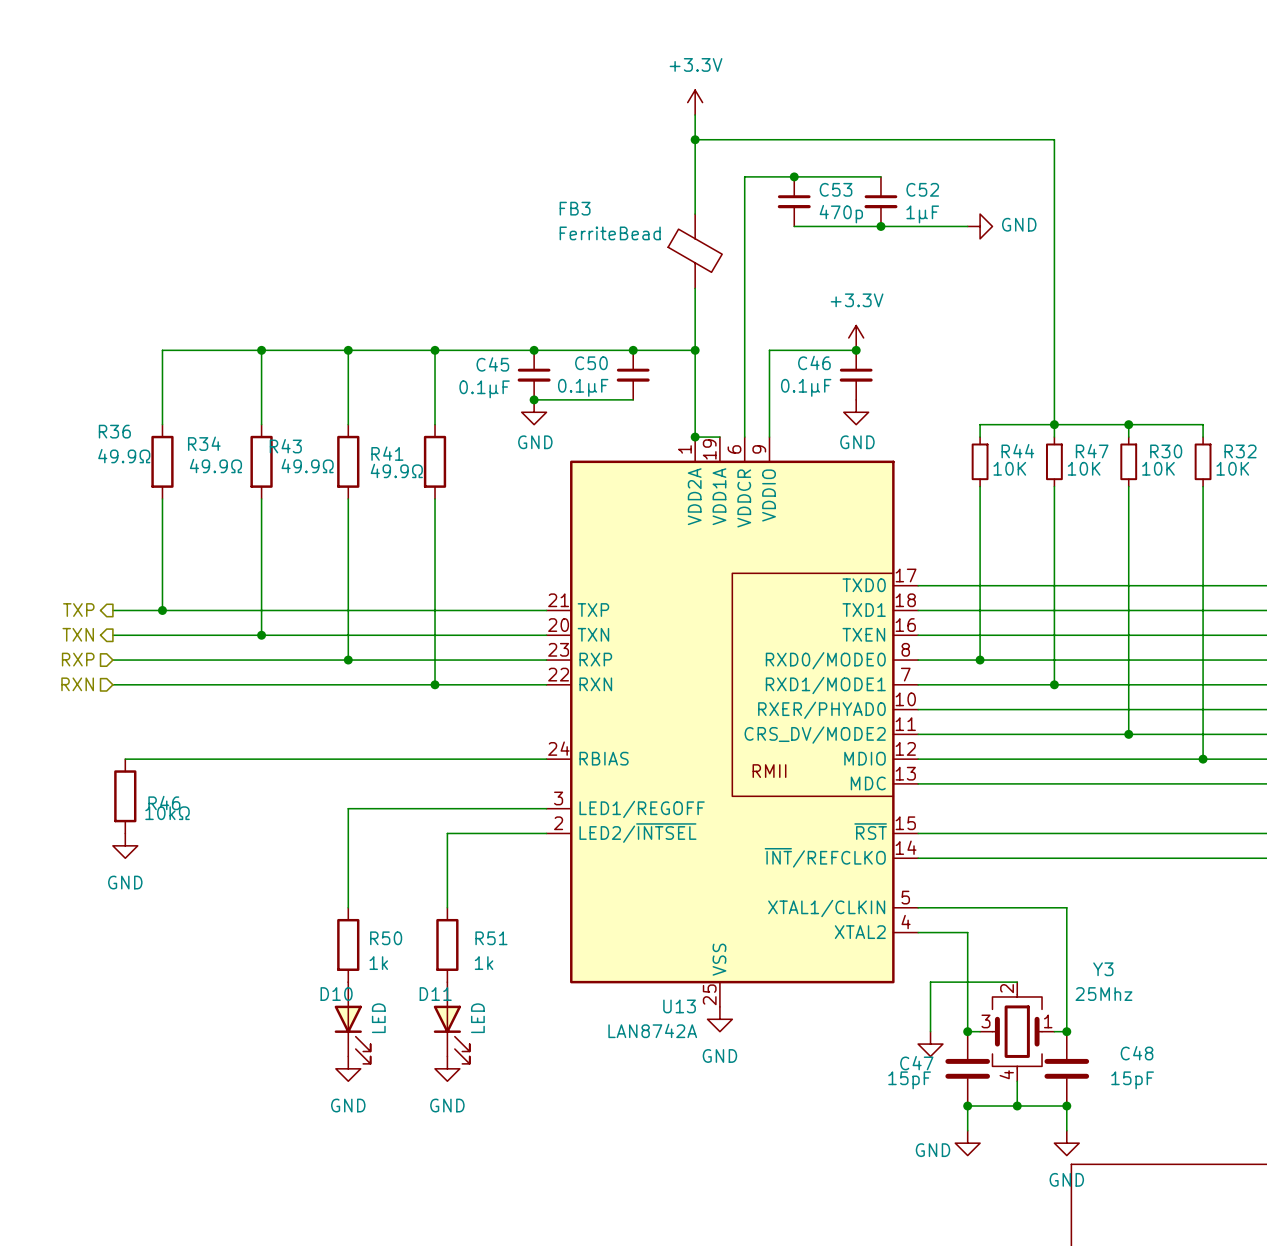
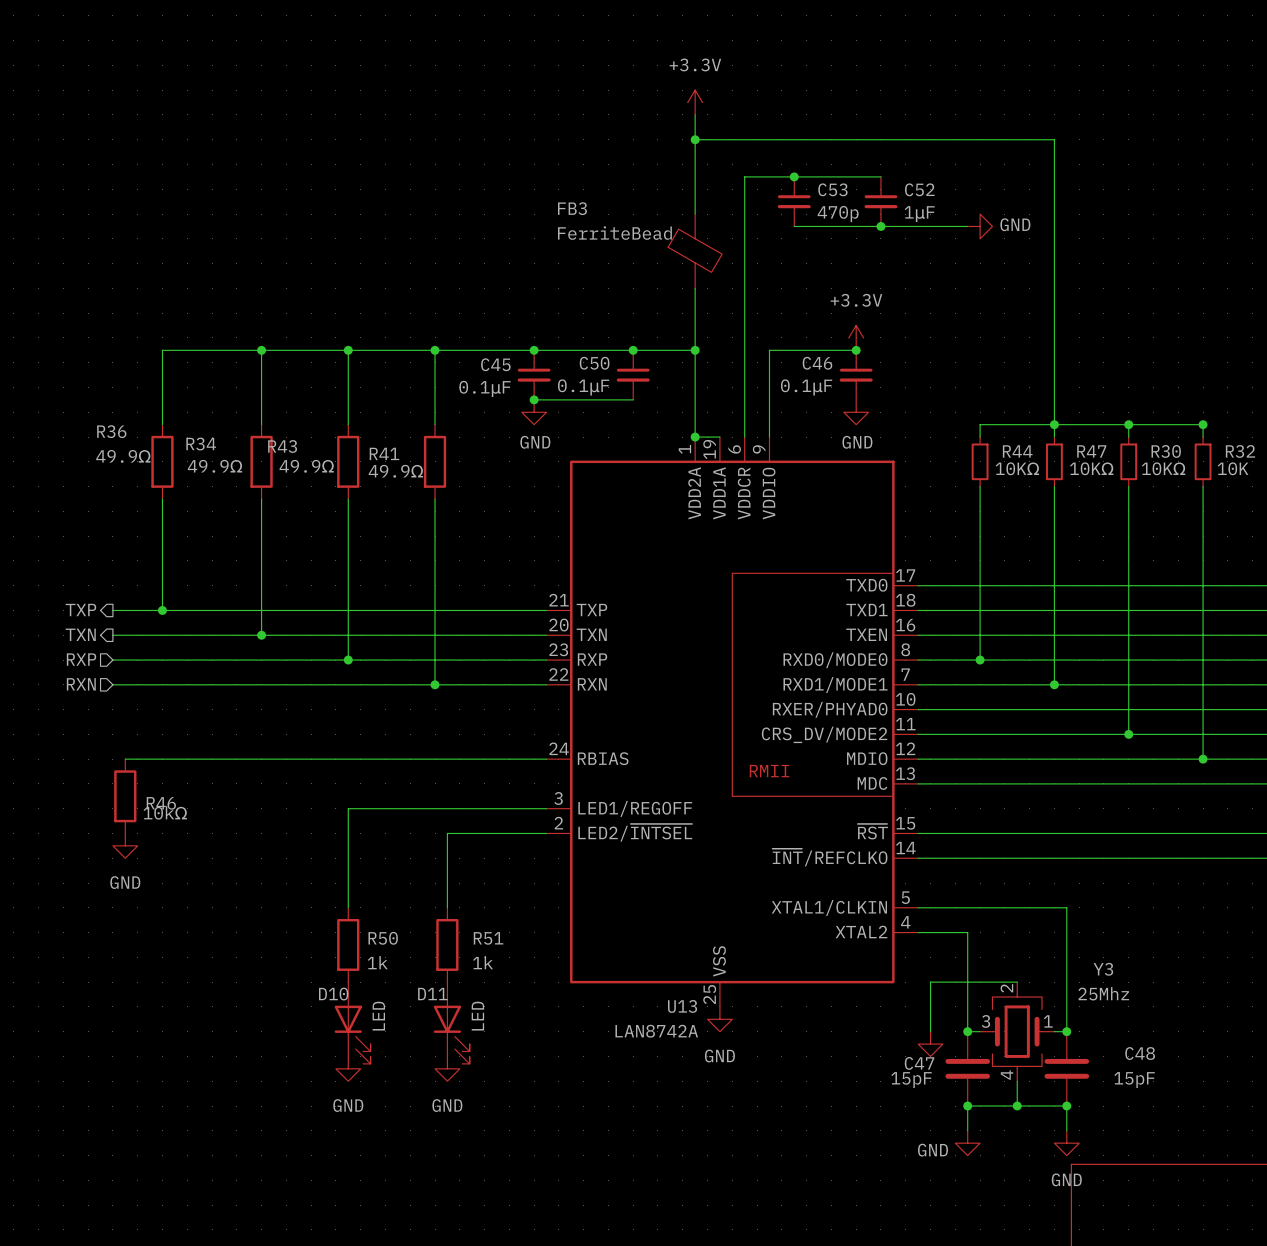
junction: none -> (1203, 424)
R44 value: 10K (1009, 468) -> 10KΩ (1017, 468)
R47 value: 10K (1084, 468) -> 10KΩ (1091, 468)
R30 value: 10K (1158, 468) -> 10KΩ (1163, 468)

